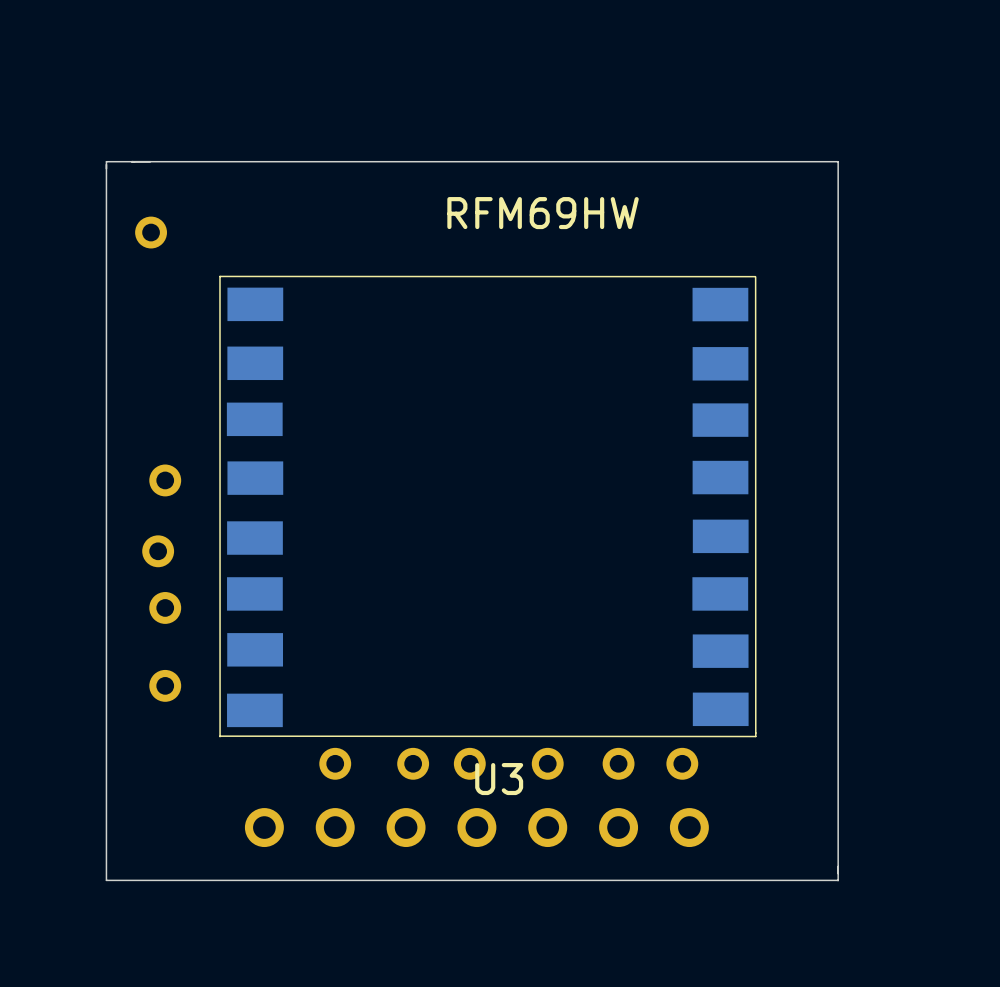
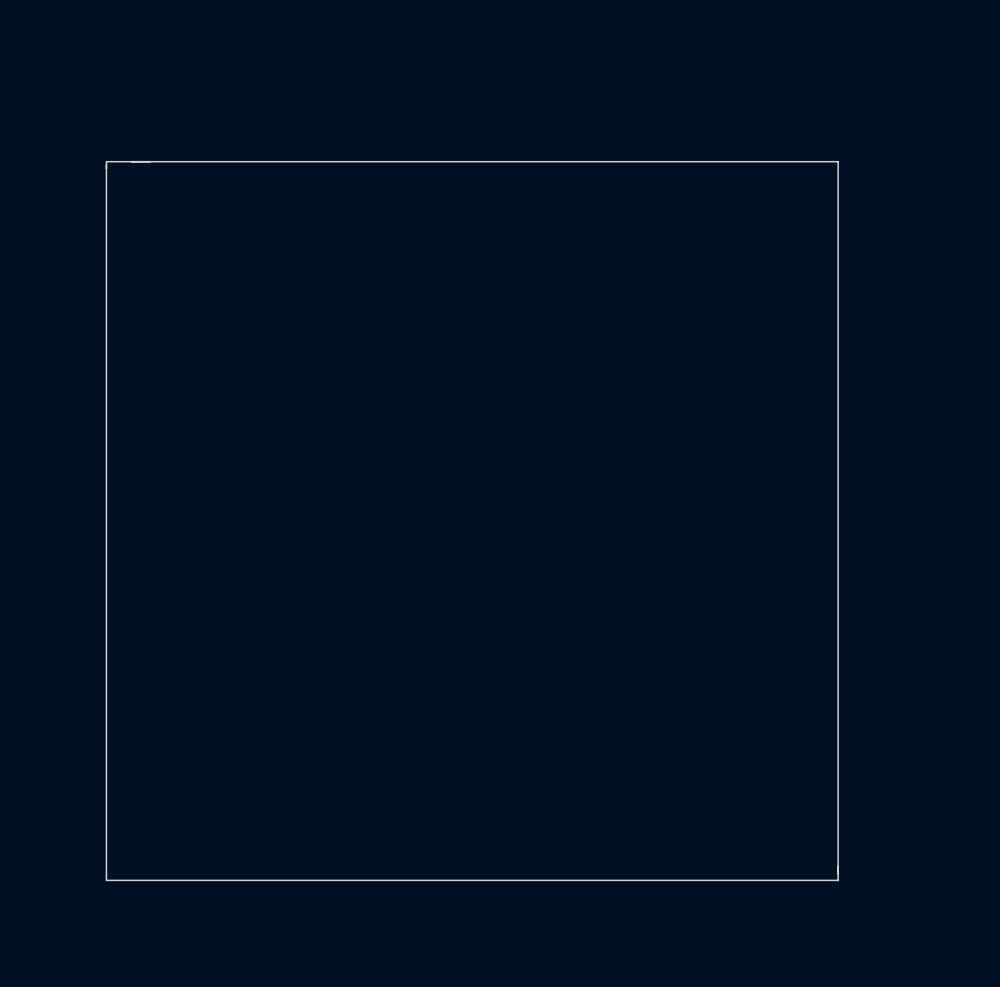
part: (151, 232) -> none
part: (165, 480) -> none
U3: RFM69HW (487, 506) -> none
part: (158, 551) -> none
part: (165, 607) -> none
part: (165, 685) -> none
part: (335, 763) -> none
part: (413, 763) -> none
part: (469, 763) -> none
part: (547, 763) -> none
part: (618, 763) -> none
part: (682, 763) -> none
part: (476, 827) -> none

